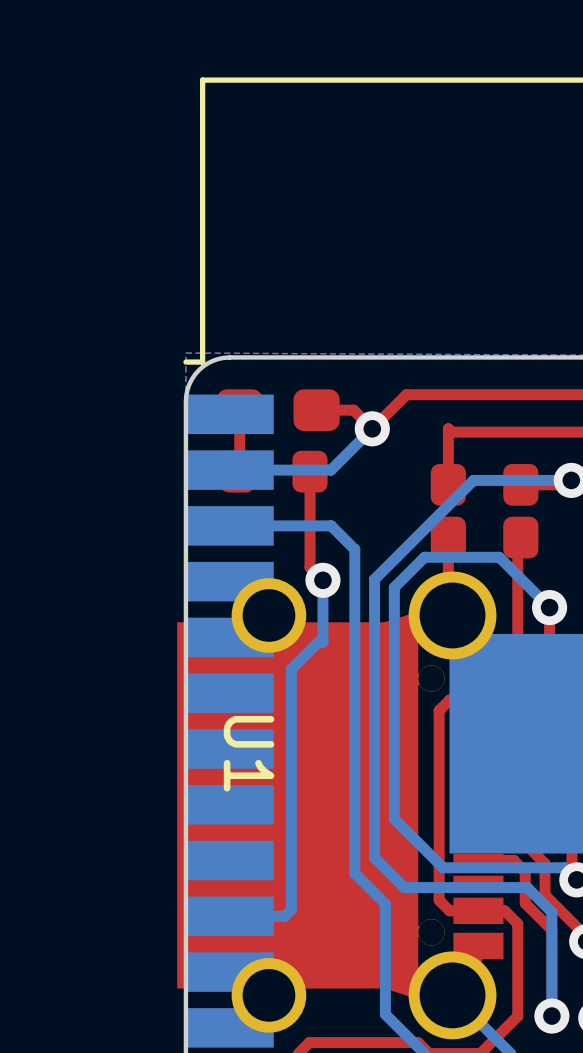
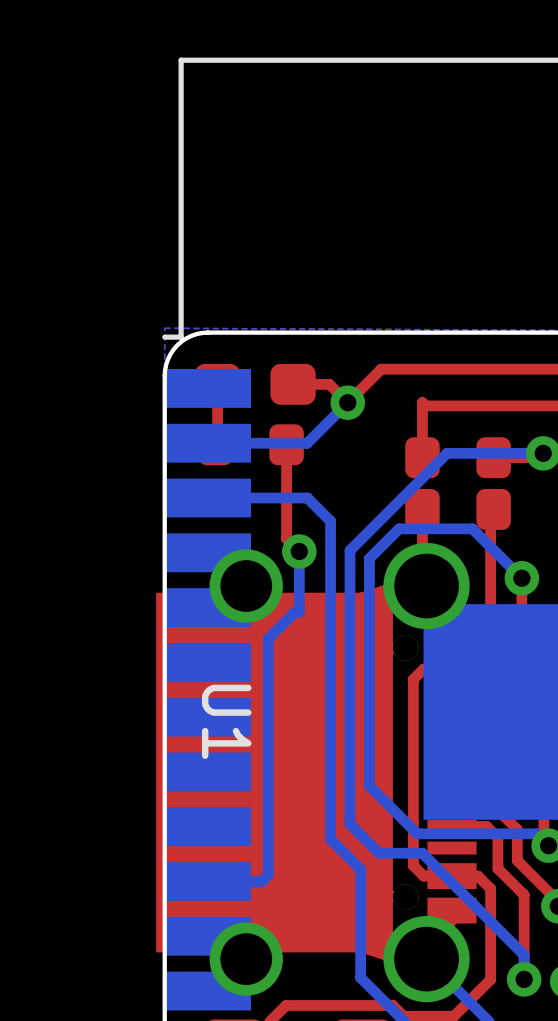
bottom track: (448, 887) (527, 887) (551, 912) (551, 991) -> (422, 853) (524, 955)

